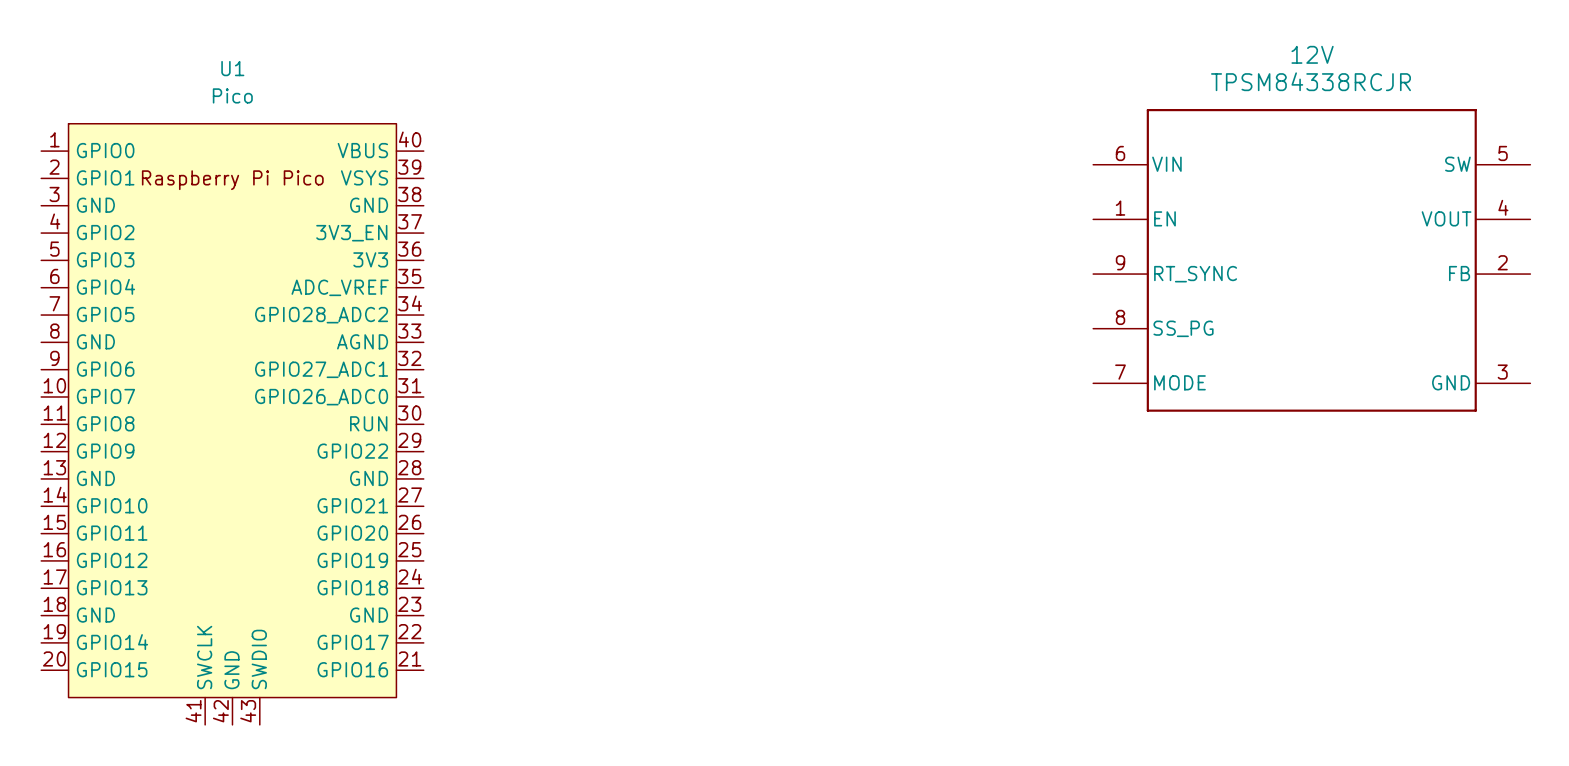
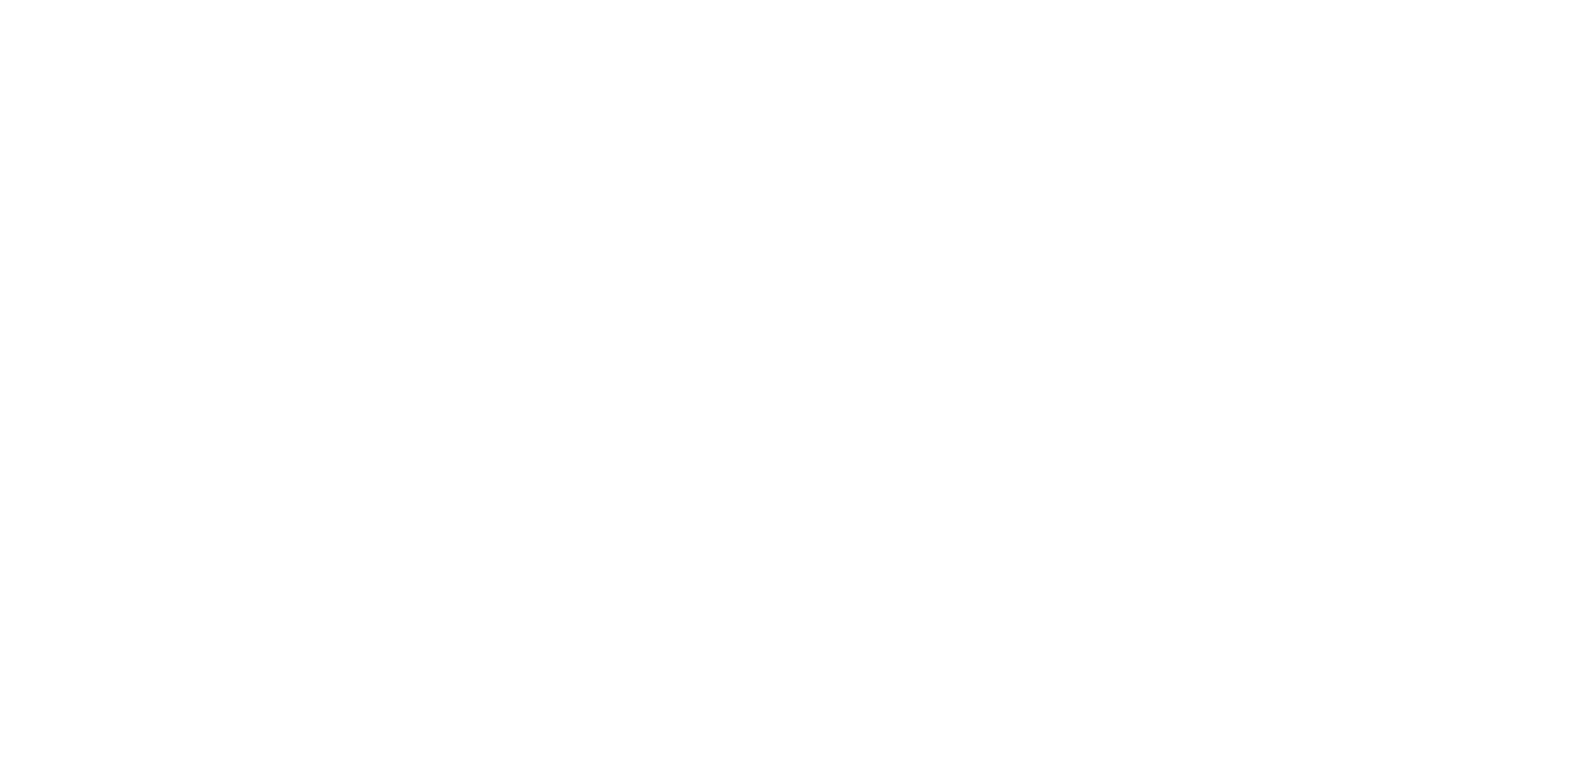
12V: TPSM84338RCJR (1311, 260) -> none
U1: Pico (232, 424) -> none

